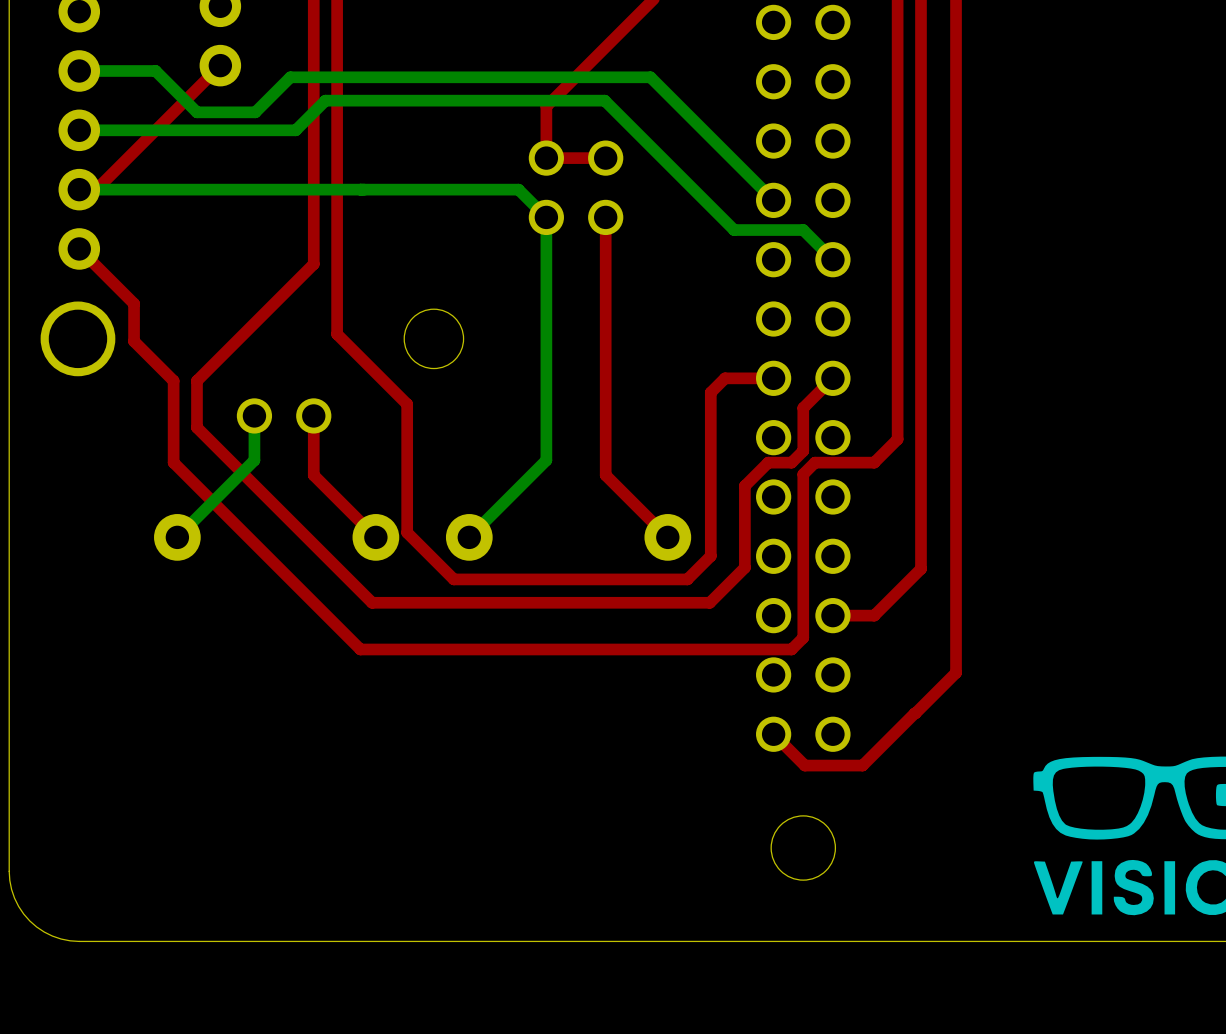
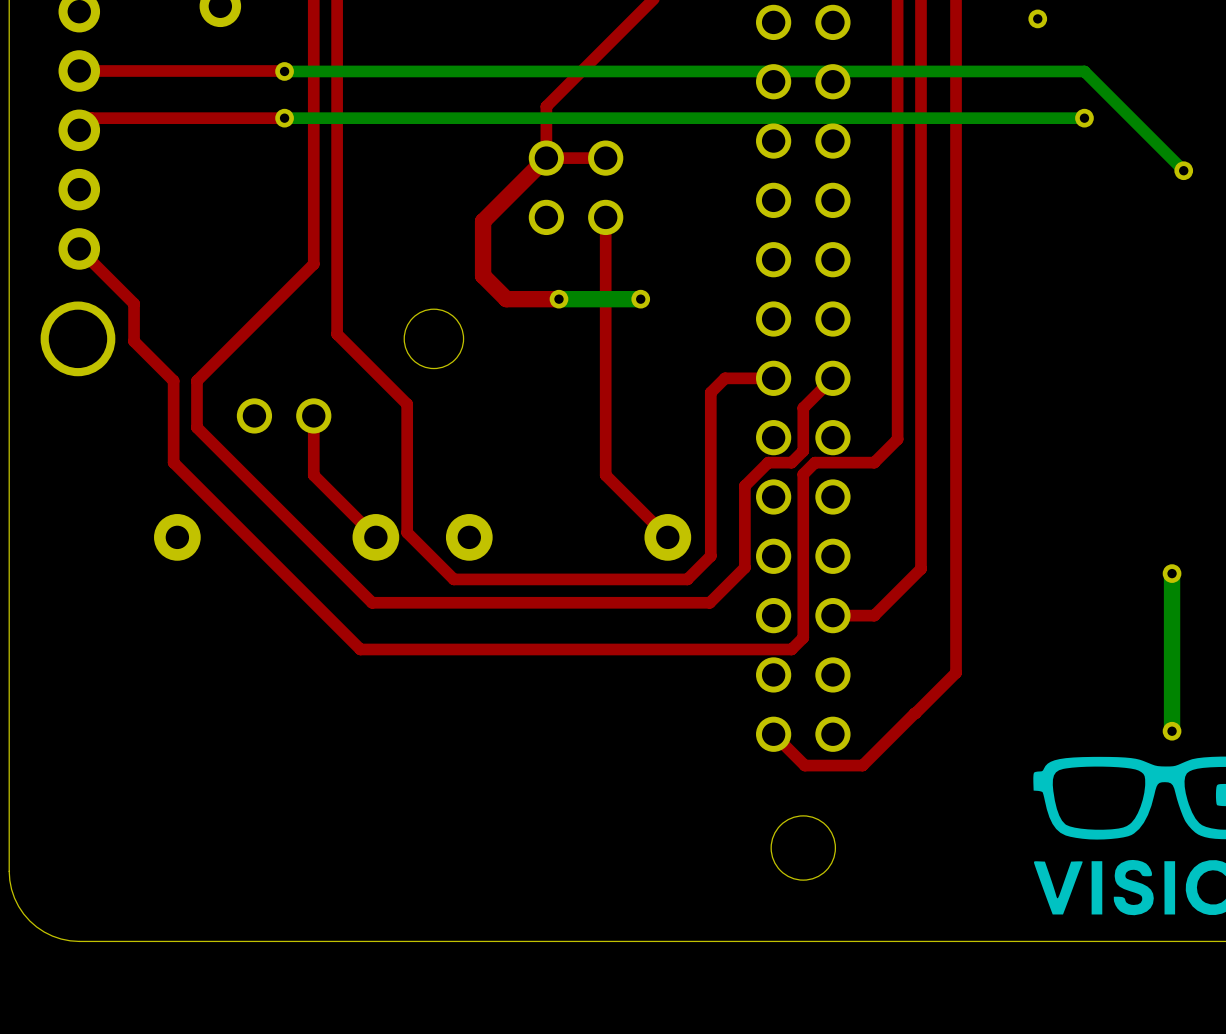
part: none -> (1037, 18)
top track: (220, 65) (96, 189) (79, 189) -> none
part: (220, 65) -> none
top track: none -> (79, 70) (284, 71)
bottom track: (79, 70) (155, 70) (196, 112) (255, 112) (290, 77) (650, 77) (773, 200) -> none
bottom track: none -> (284, 71) (1084, 71) (1183, 170)
part: none -> (284, 71)
top track: none -> (284, 118) (91, 118) (79, 130)
part: none -> (284, 118)
bottom track: none -> (1084, 118) (284, 118)
part: none -> (1084, 118)
bottom track: (79, 130) (295, 130) (325, 100) (604, 100) (734, 230) (803, 230) (832, 259) -> none
top track: none -> (546, 158) (483, 221) (483, 275) (506, 299) (558, 299)
part: none -> (1183, 170)
bottom track: (79, 189) (518, 189) (546, 217) (546, 460) (469, 537) -> none
part: none -> (558, 299)
bottom track: none -> (640, 299) (558, 299)
part: none -> (640, 299)
bottom track: (254, 415) (254, 460) (177, 537) -> none
bottom track: none -> (1172, 573) (1172, 731)
part: none -> (1172, 573)
part: none -> (1172, 731)

